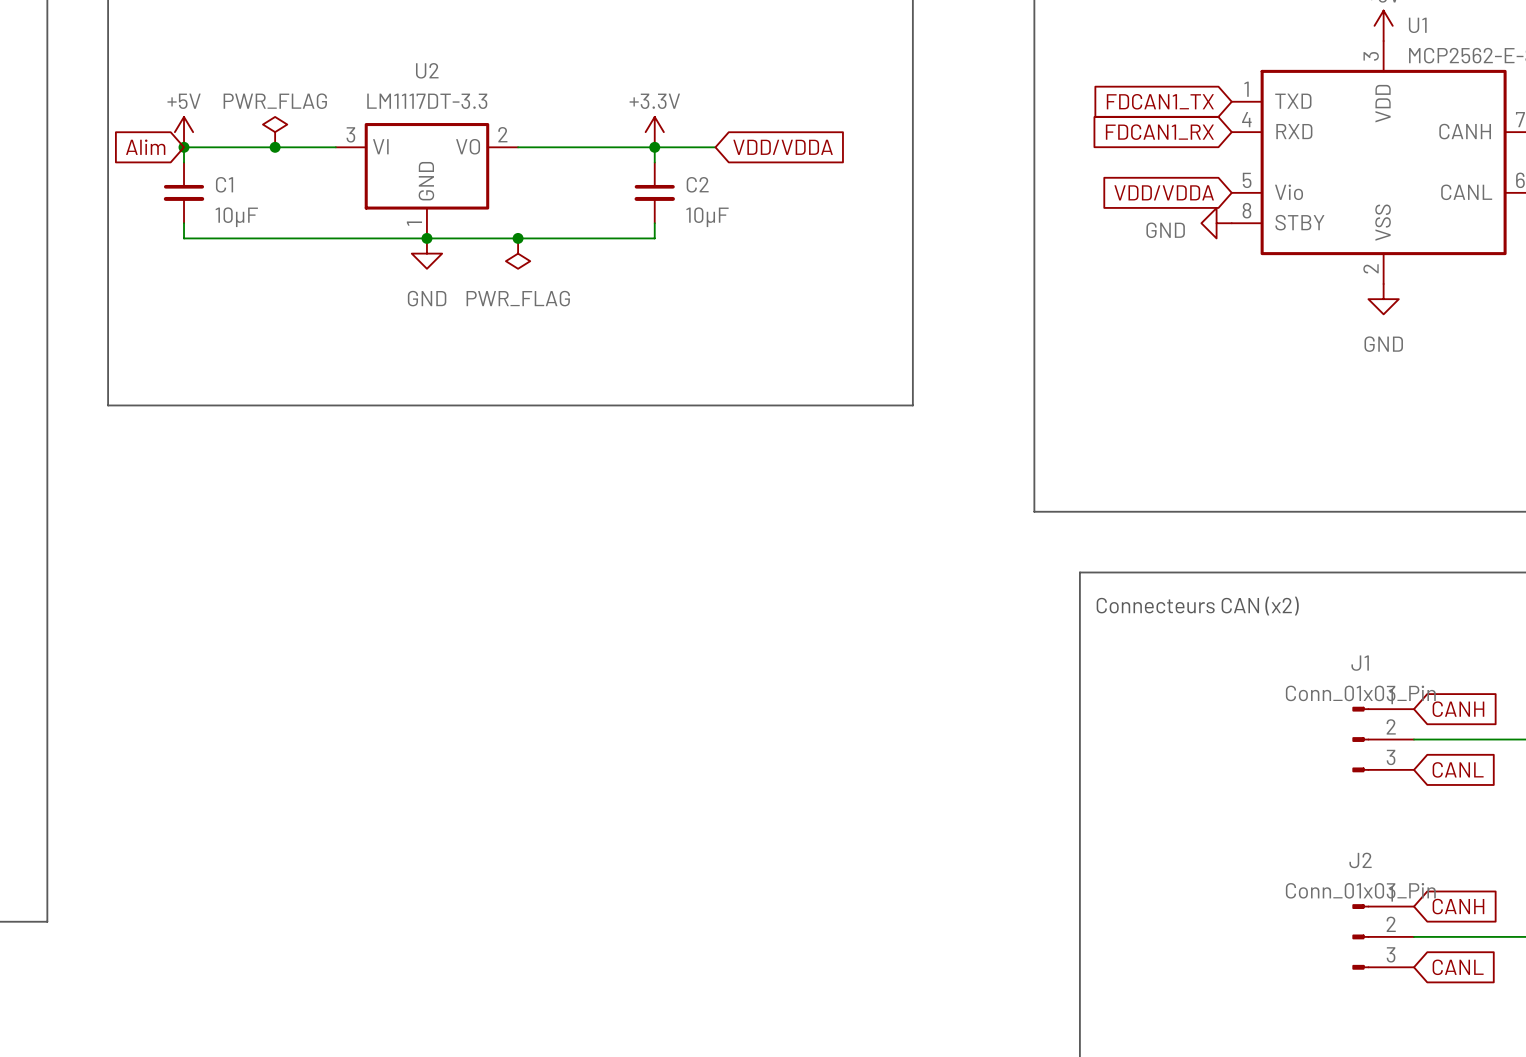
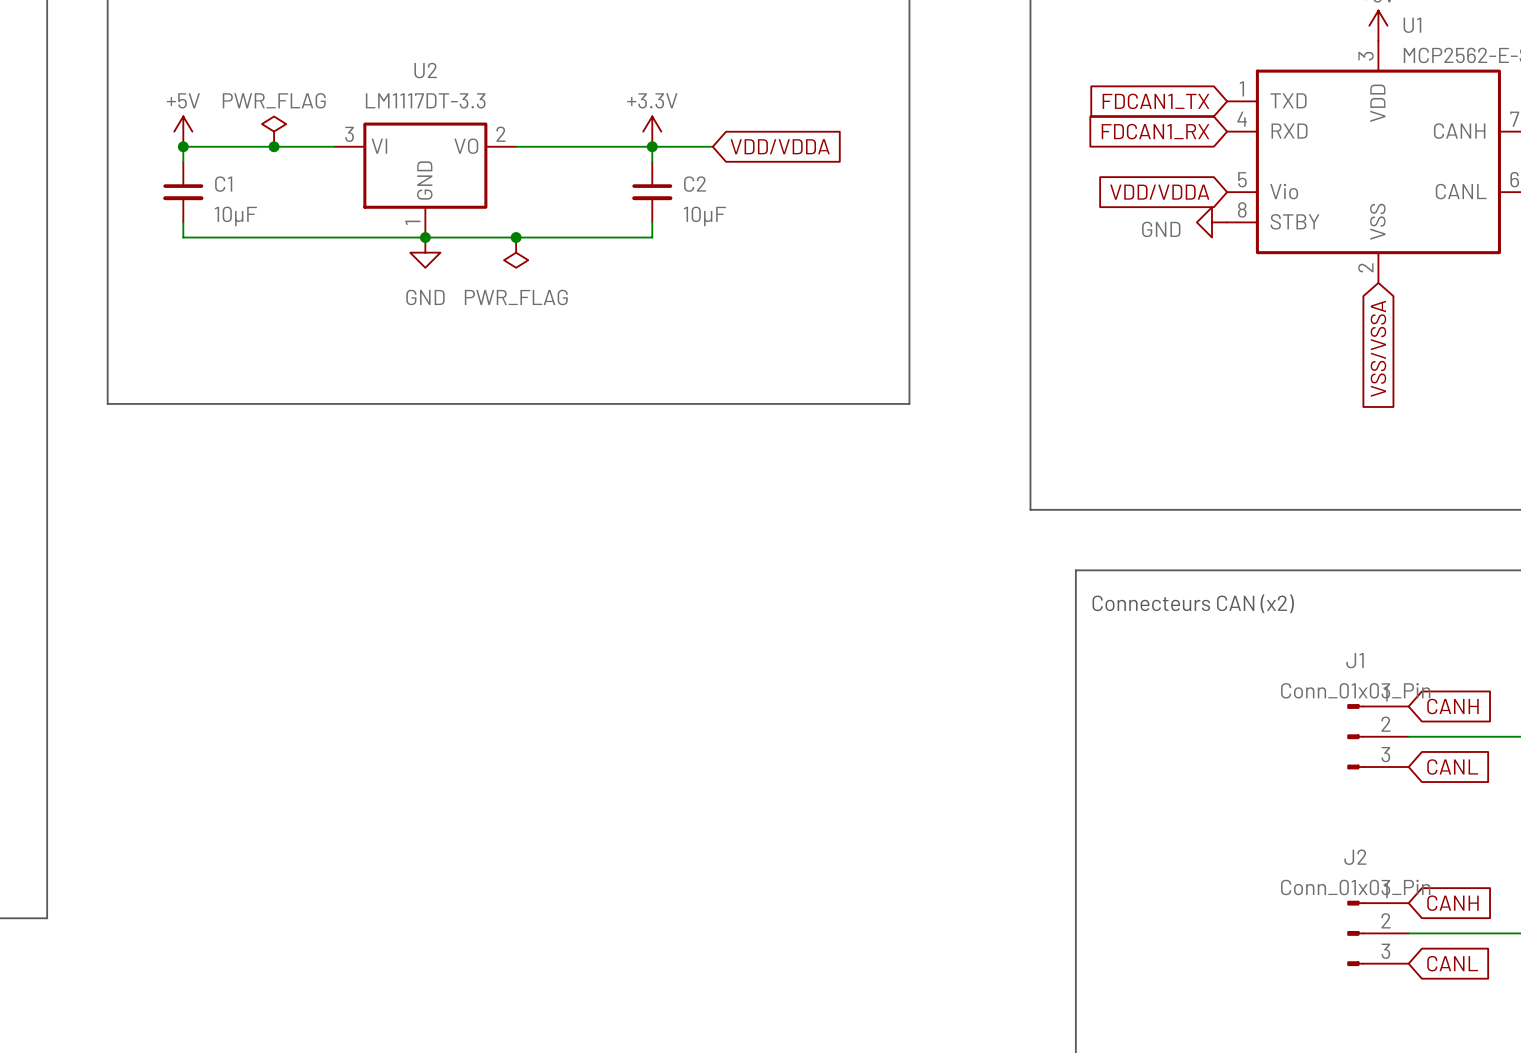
global label: Alim (145, 147) -> none
power symbol: GND (1383, 299) -> none
global label: none -> VSS/VSSA (1378, 348)

